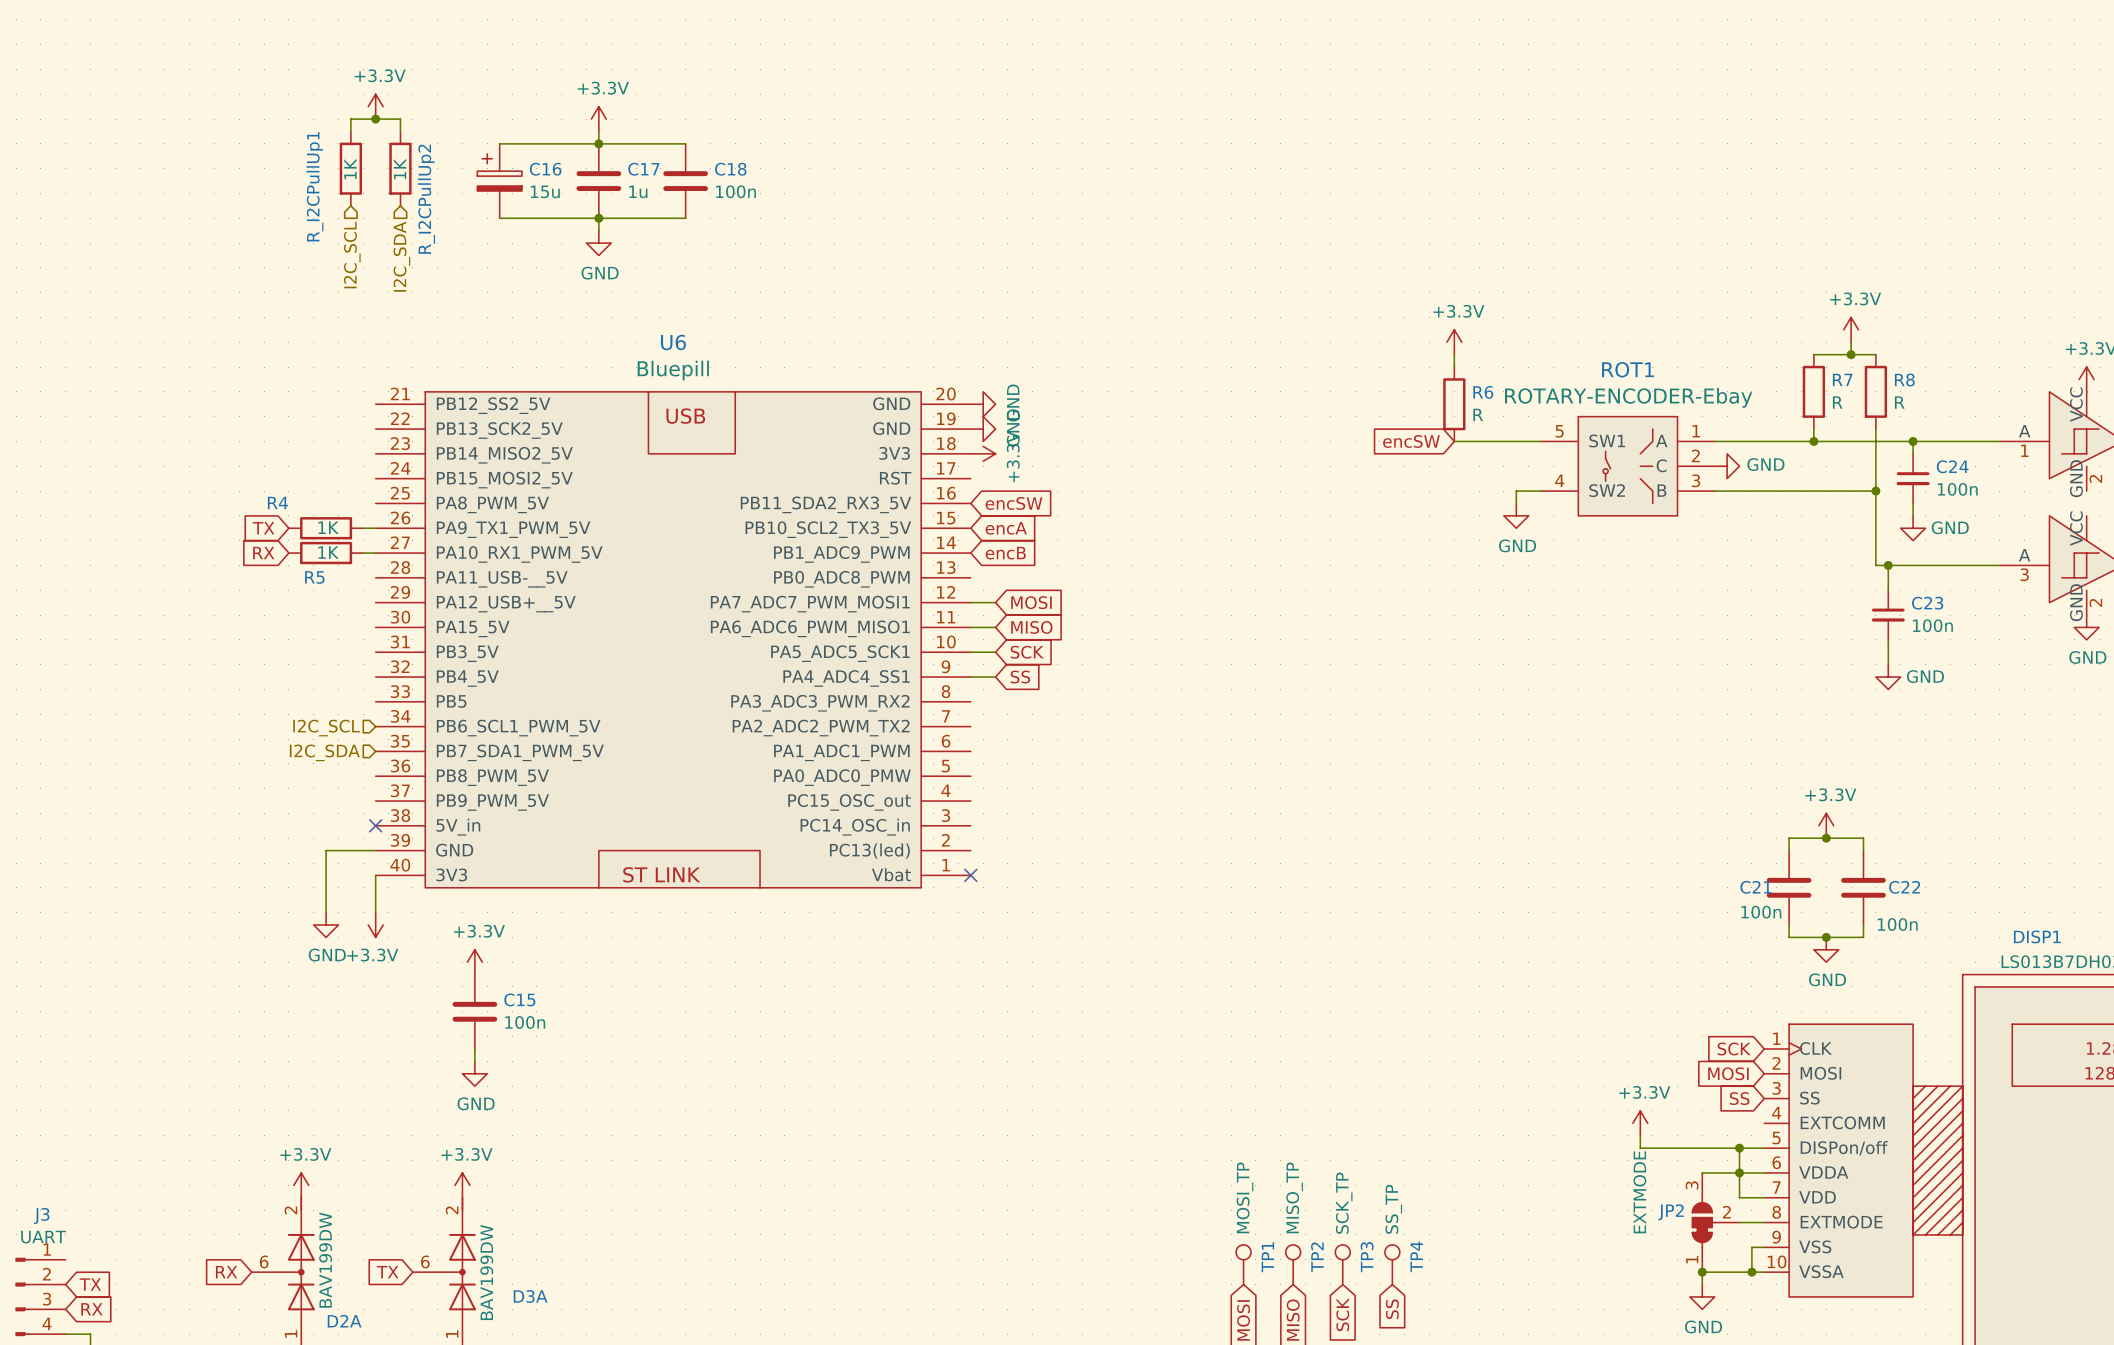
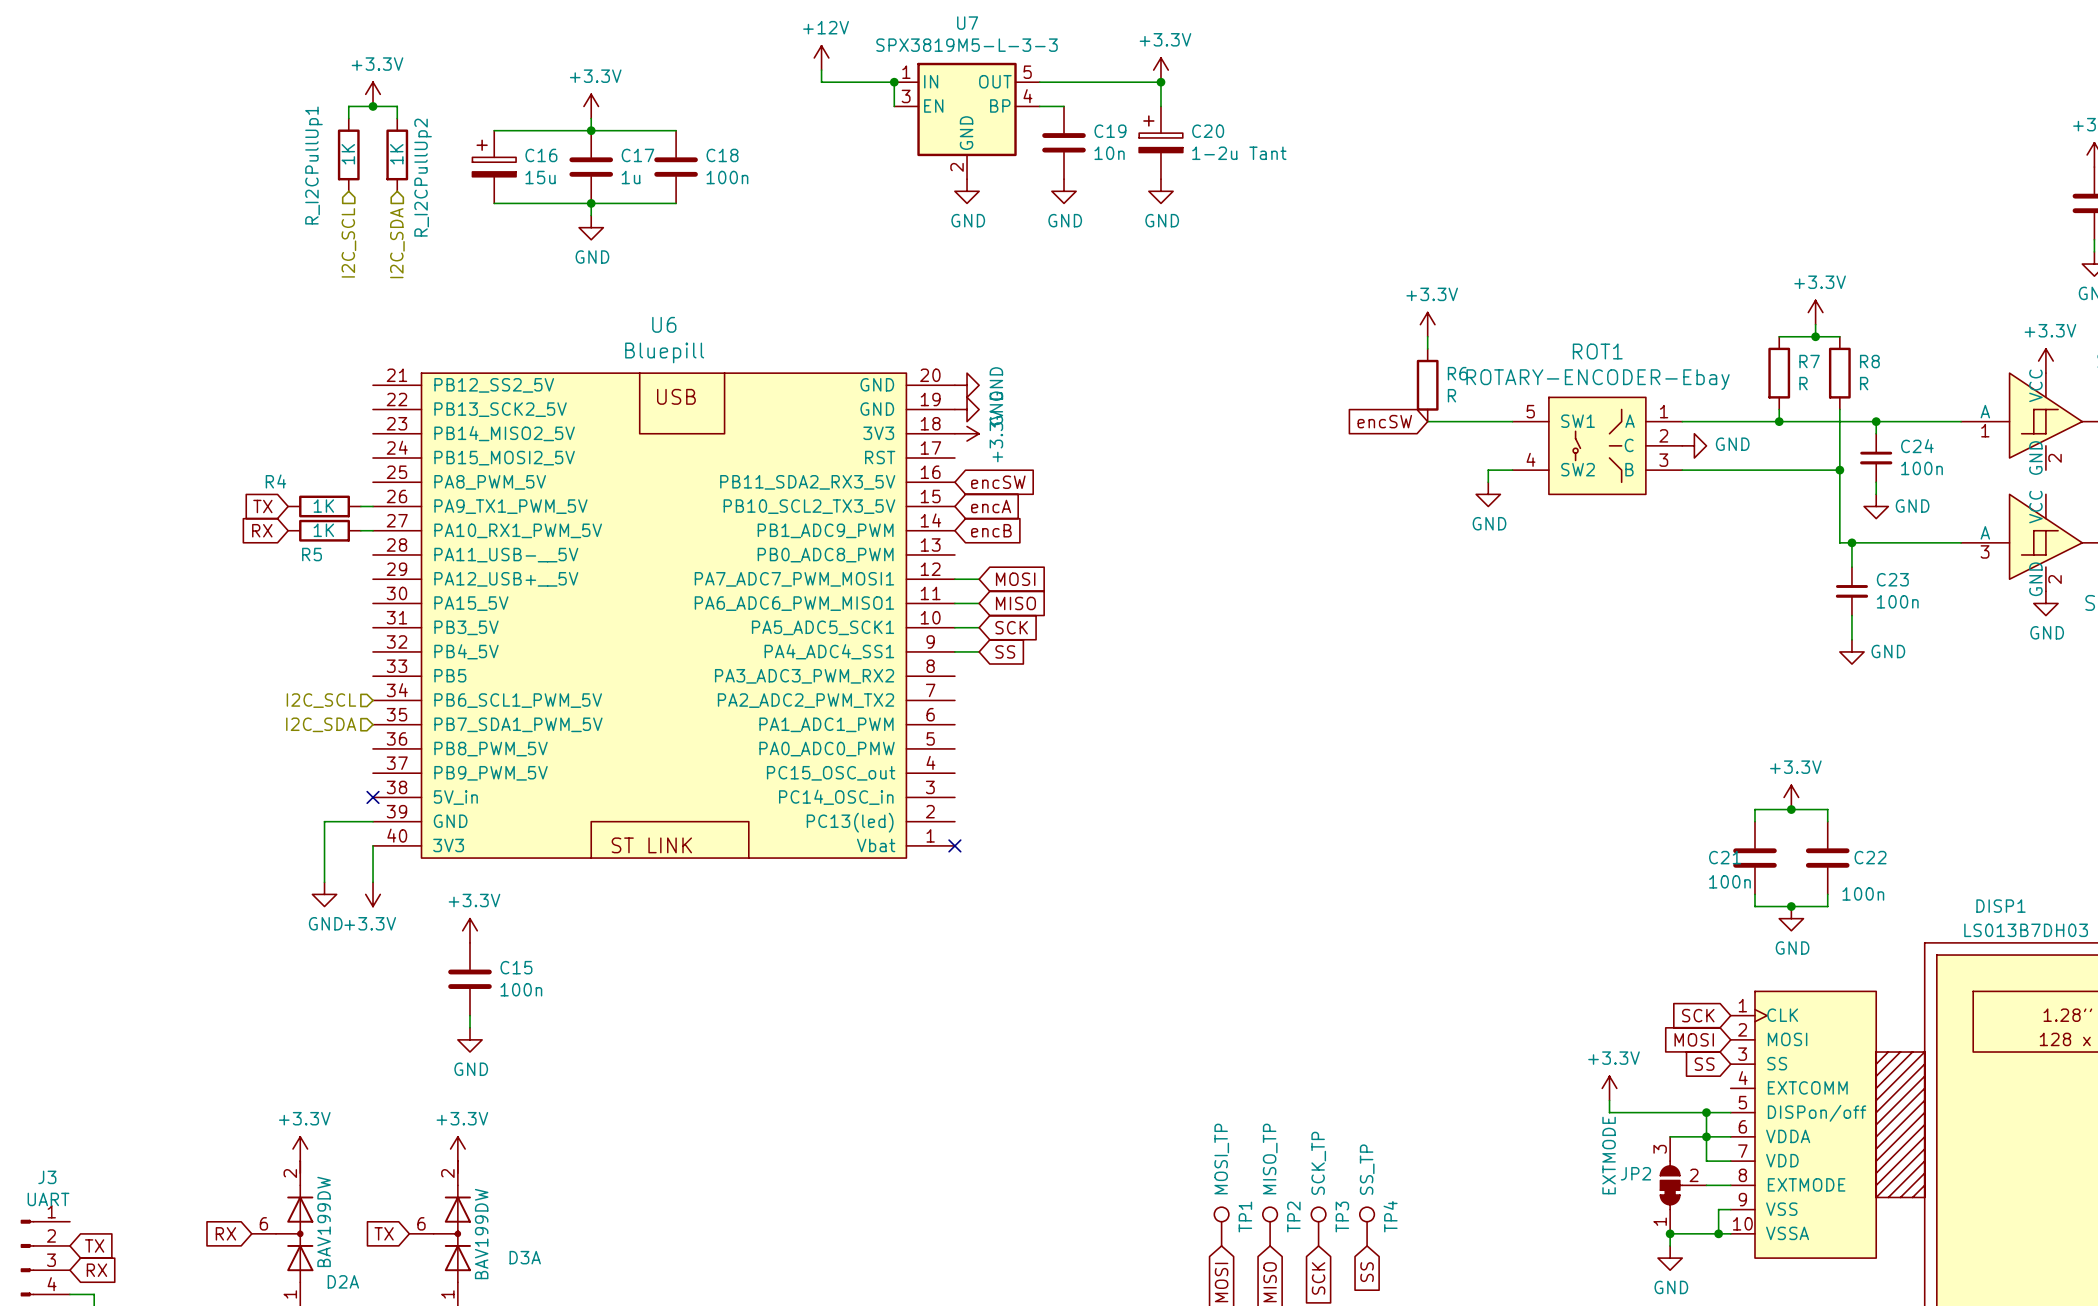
power symbol: none -> +12V (821, 57)
wire: none -> (821, 70) (821, 82) (894, 82) (894, 106)
power symbol: none -> +3.3V (1160, 70)
junction: none -> (894, 82)
wire: none -> (1039, 82) (1160, 82) (1160, 106)
junction: none -> (1160, 82)
wire: none -> (1039, 106) (1064, 106)
U7: none -> SPX3819M5-L-3-3 (967, 120)
C19: none -> 10n (1064, 142)
C20: none -> 1-2u Tant (1160, 142)
power symbol: none -> GND (967, 191)
power symbol: none -> GND (1064, 191)
power symbol: none -> GND (1160, 191)

